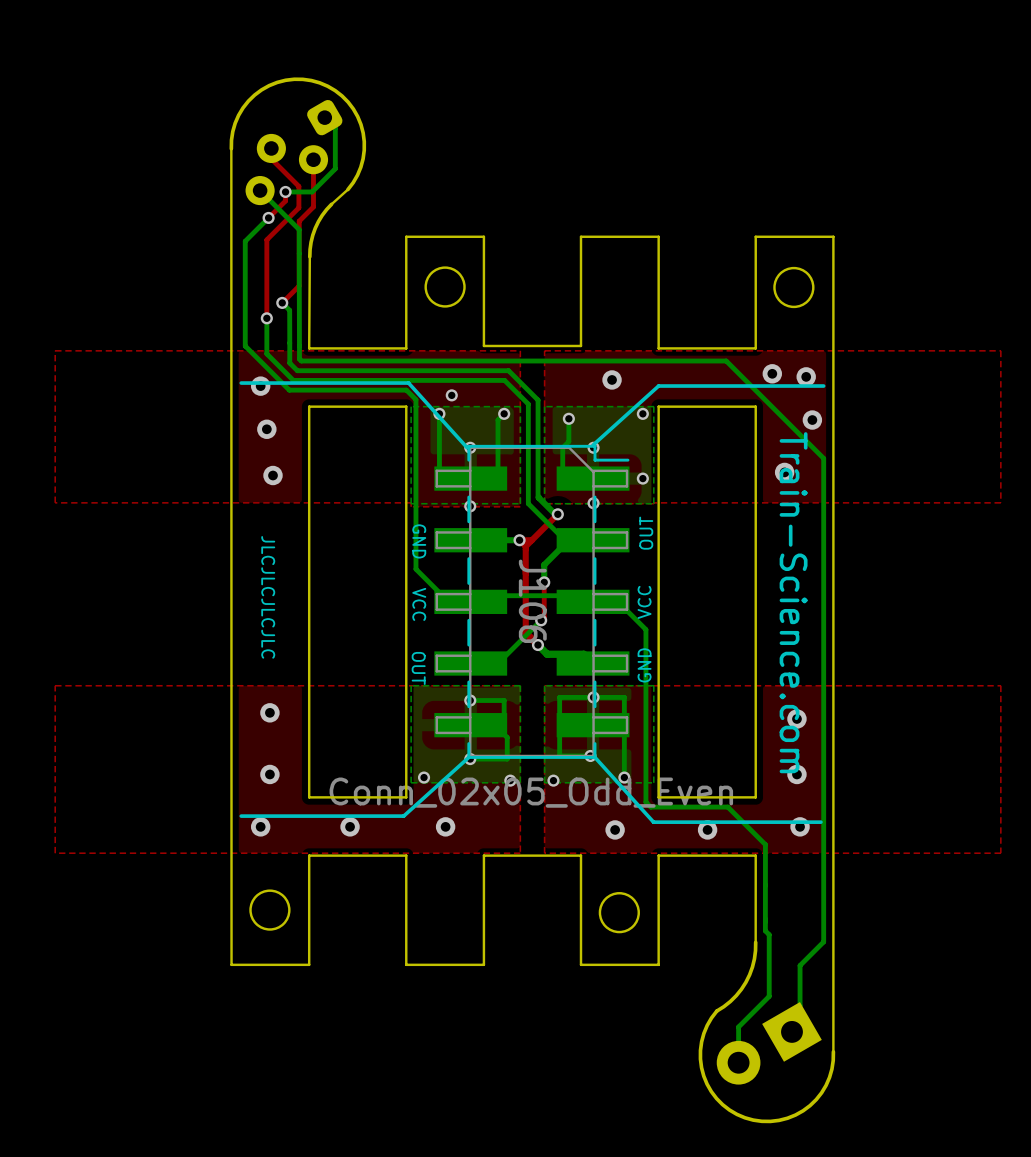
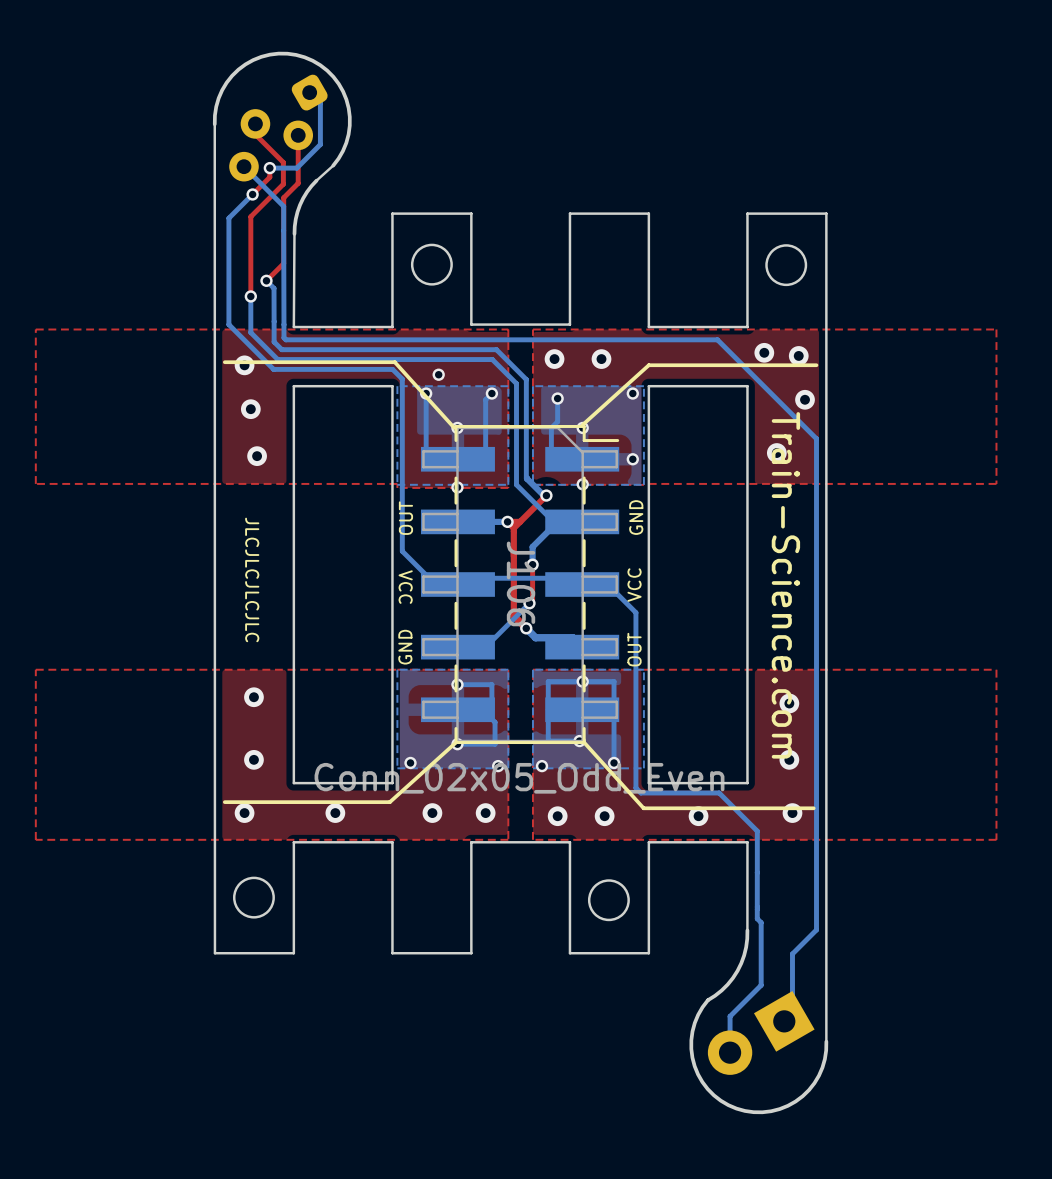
via: none -> (554, 359)
text: OUT (646, 533) -> GND (636, 517)
text: GND (419, 541) -> none
text: none -> GND (405, 647)
text: GND (644, 665) -> OUT (634, 649)
text rotation: 0° (418, 668) -> 180° (405, 518)
text position: OUT (418, 668) -> OUT (405, 518)
via: none -> (485, 813)
via: none -> (557, 816)

